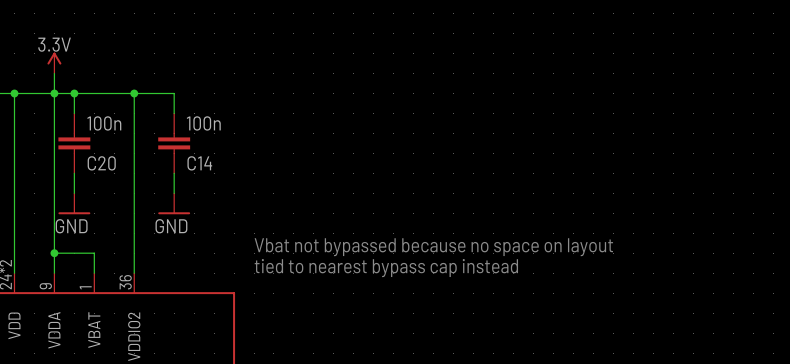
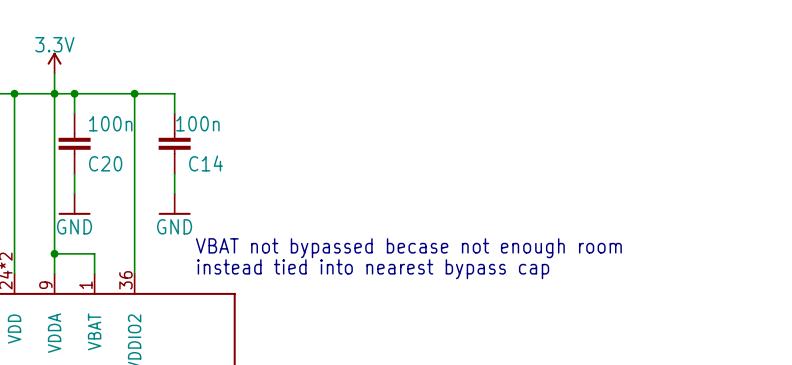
text: Vbat not bypassed because no space on layout (433, 247) -> VBAT not bypassed becase not enough room (408, 248)
text: tied to nearest bypass cap instead (386, 268) -> instead tied into nearest bypass cap (373, 269)

